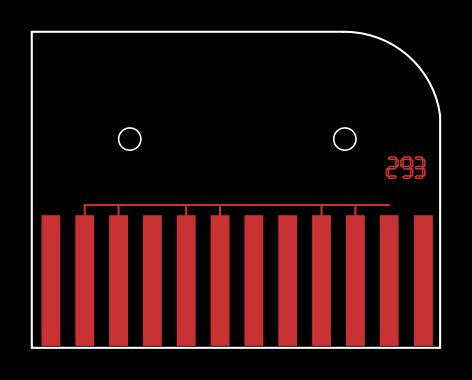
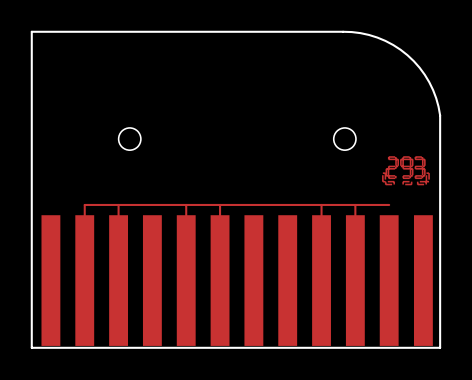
zone outline: none -> (382, 173) (382, 181) (385, 181) (385, 173) (382, 173)
zone outline: none -> (426, 173) (429, 173) (429, 181) (426, 181) (426, 173)
zone outline: none -> (385, 181) (394, 181) (394, 184) (385, 184) (385, 181)
zone outline: none -> (403, 181) (411, 181) (411, 184) (403, 184) (403, 181)
zone outline: none -> (417, 181) (426, 181) (426, 184) (417, 184) (417, 181)

